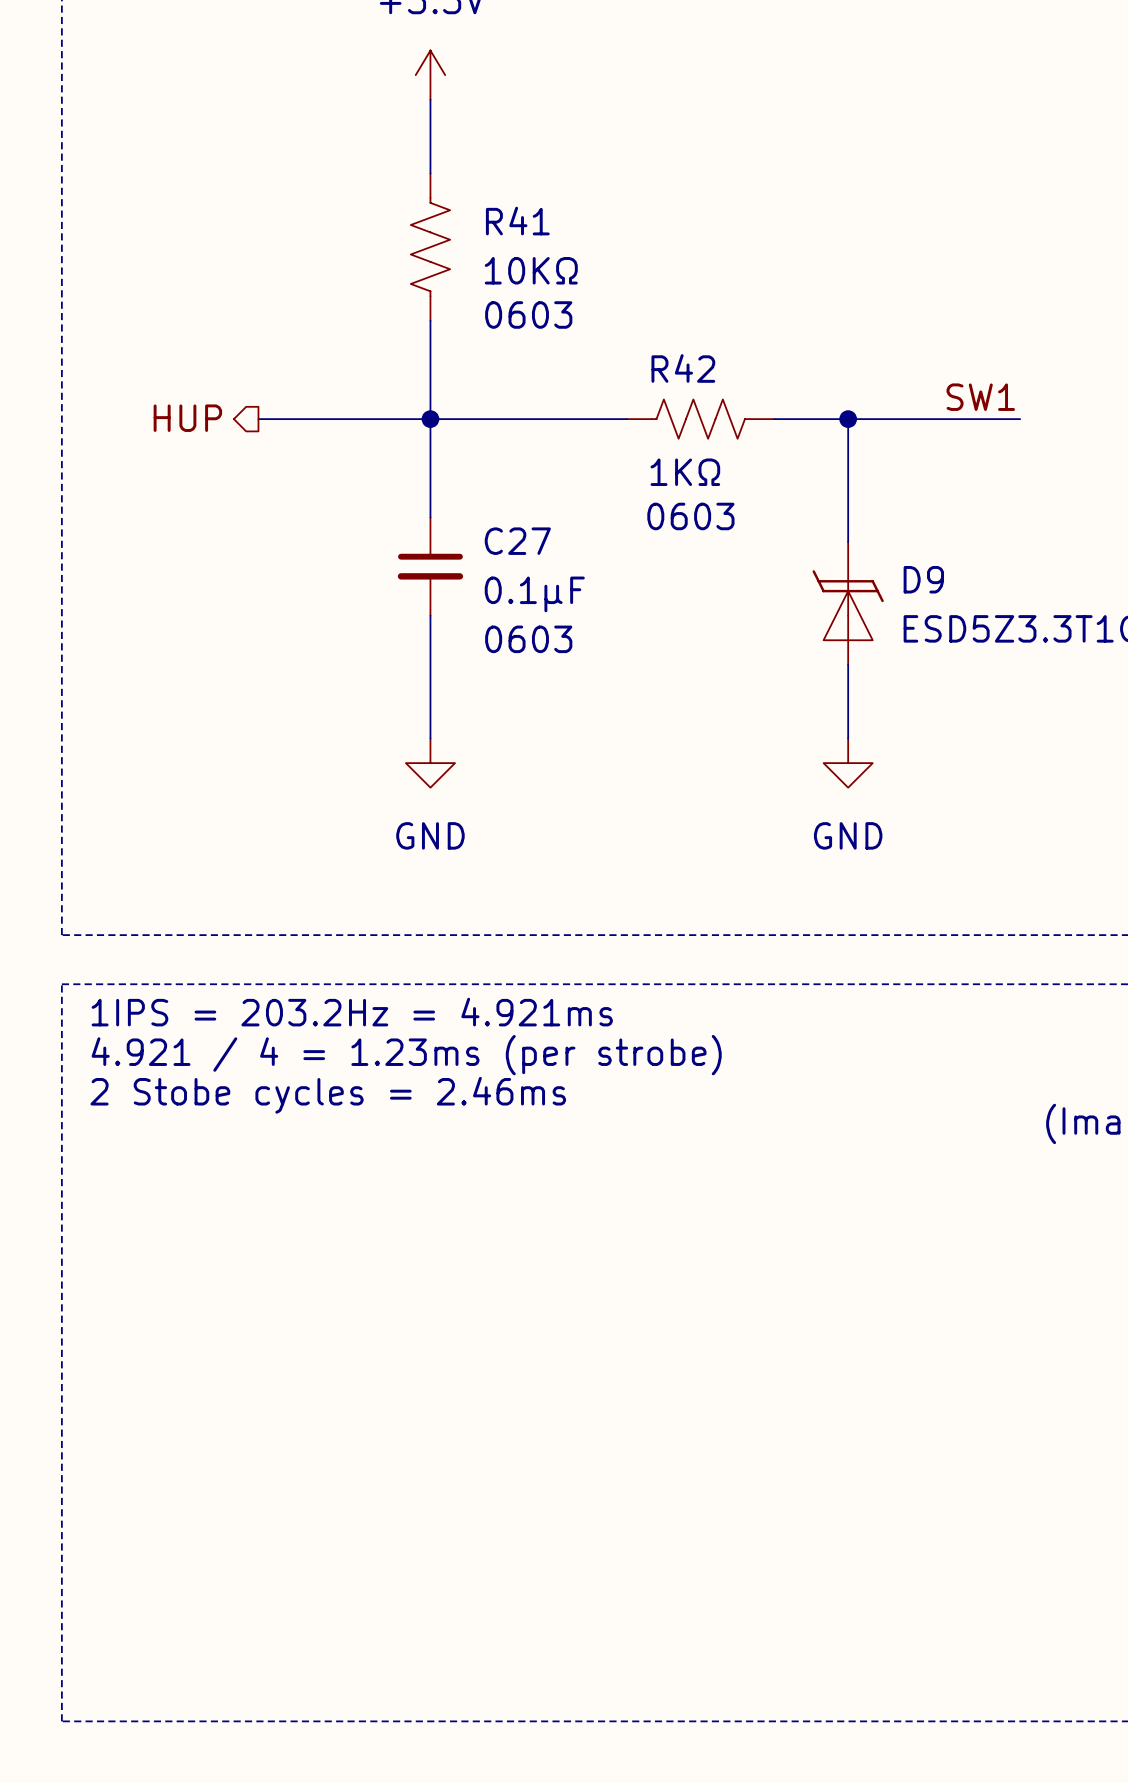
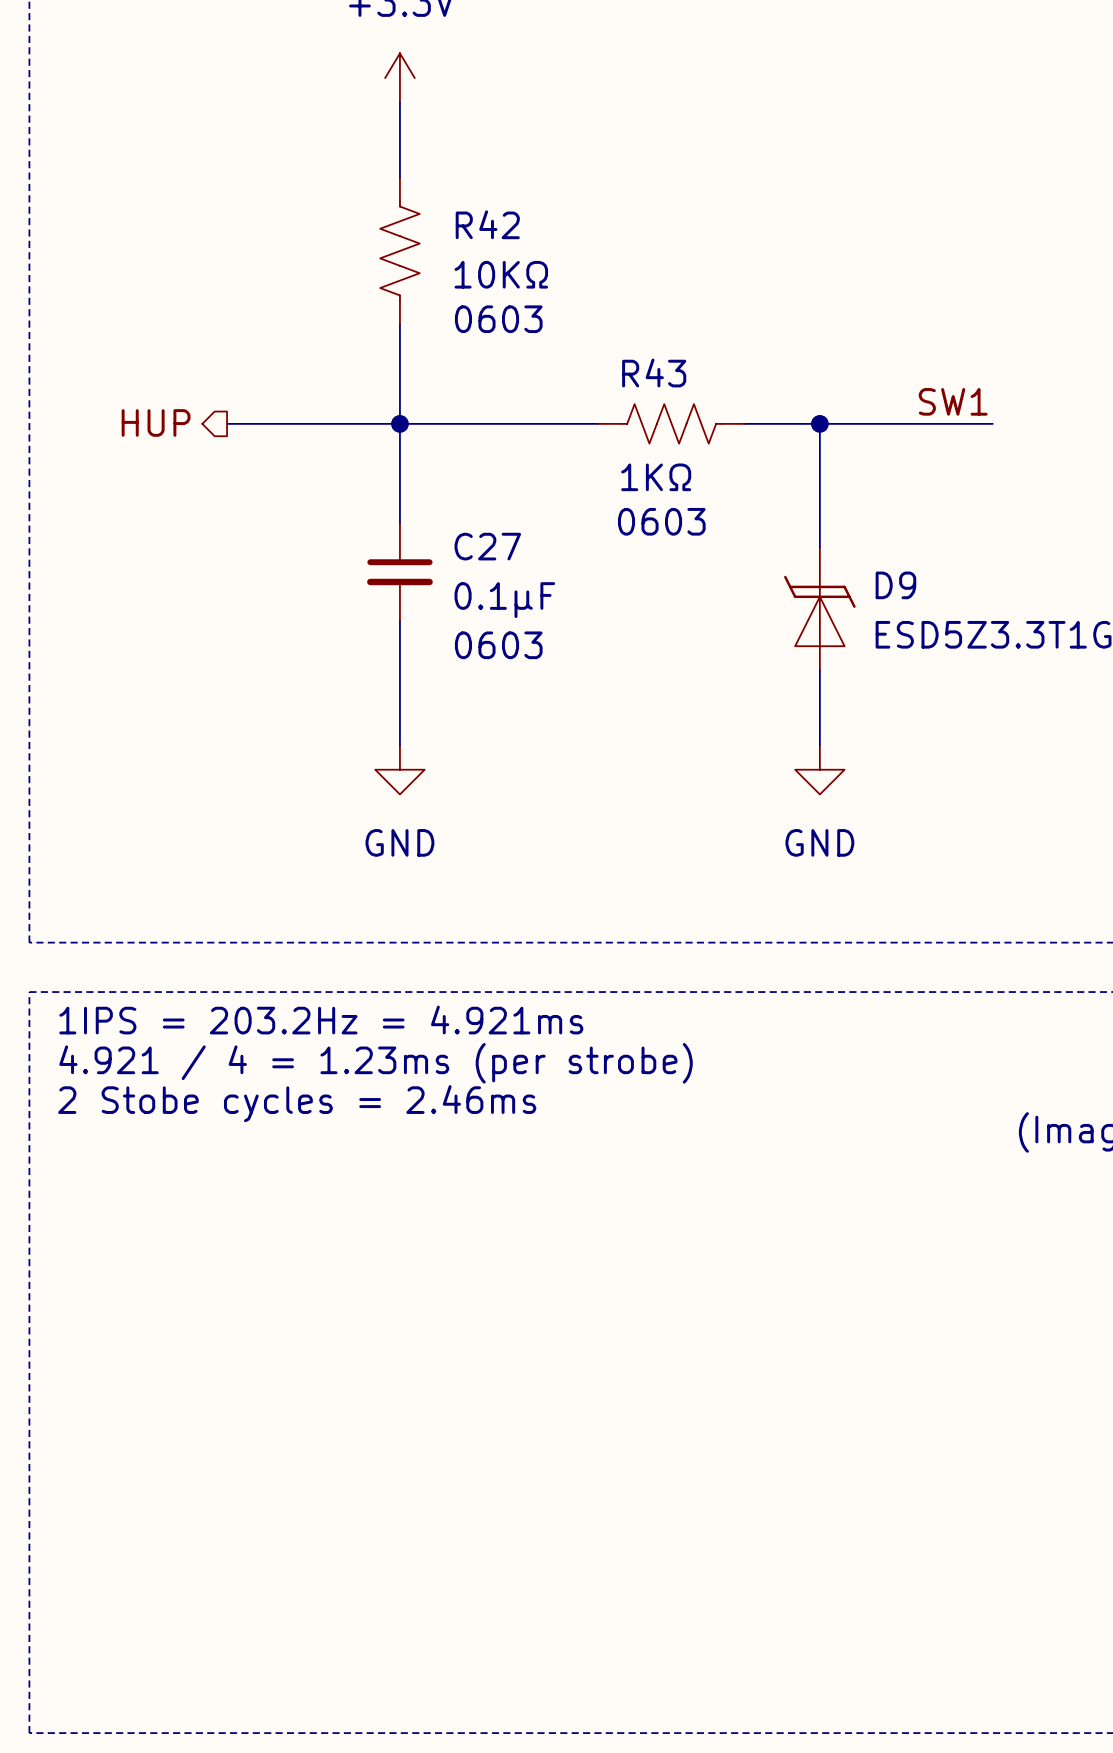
R41 name: R41 (517, 221) -> R42 (487, 224)
R42 name: R42 (683, 368) -> R43 (654, 372)

